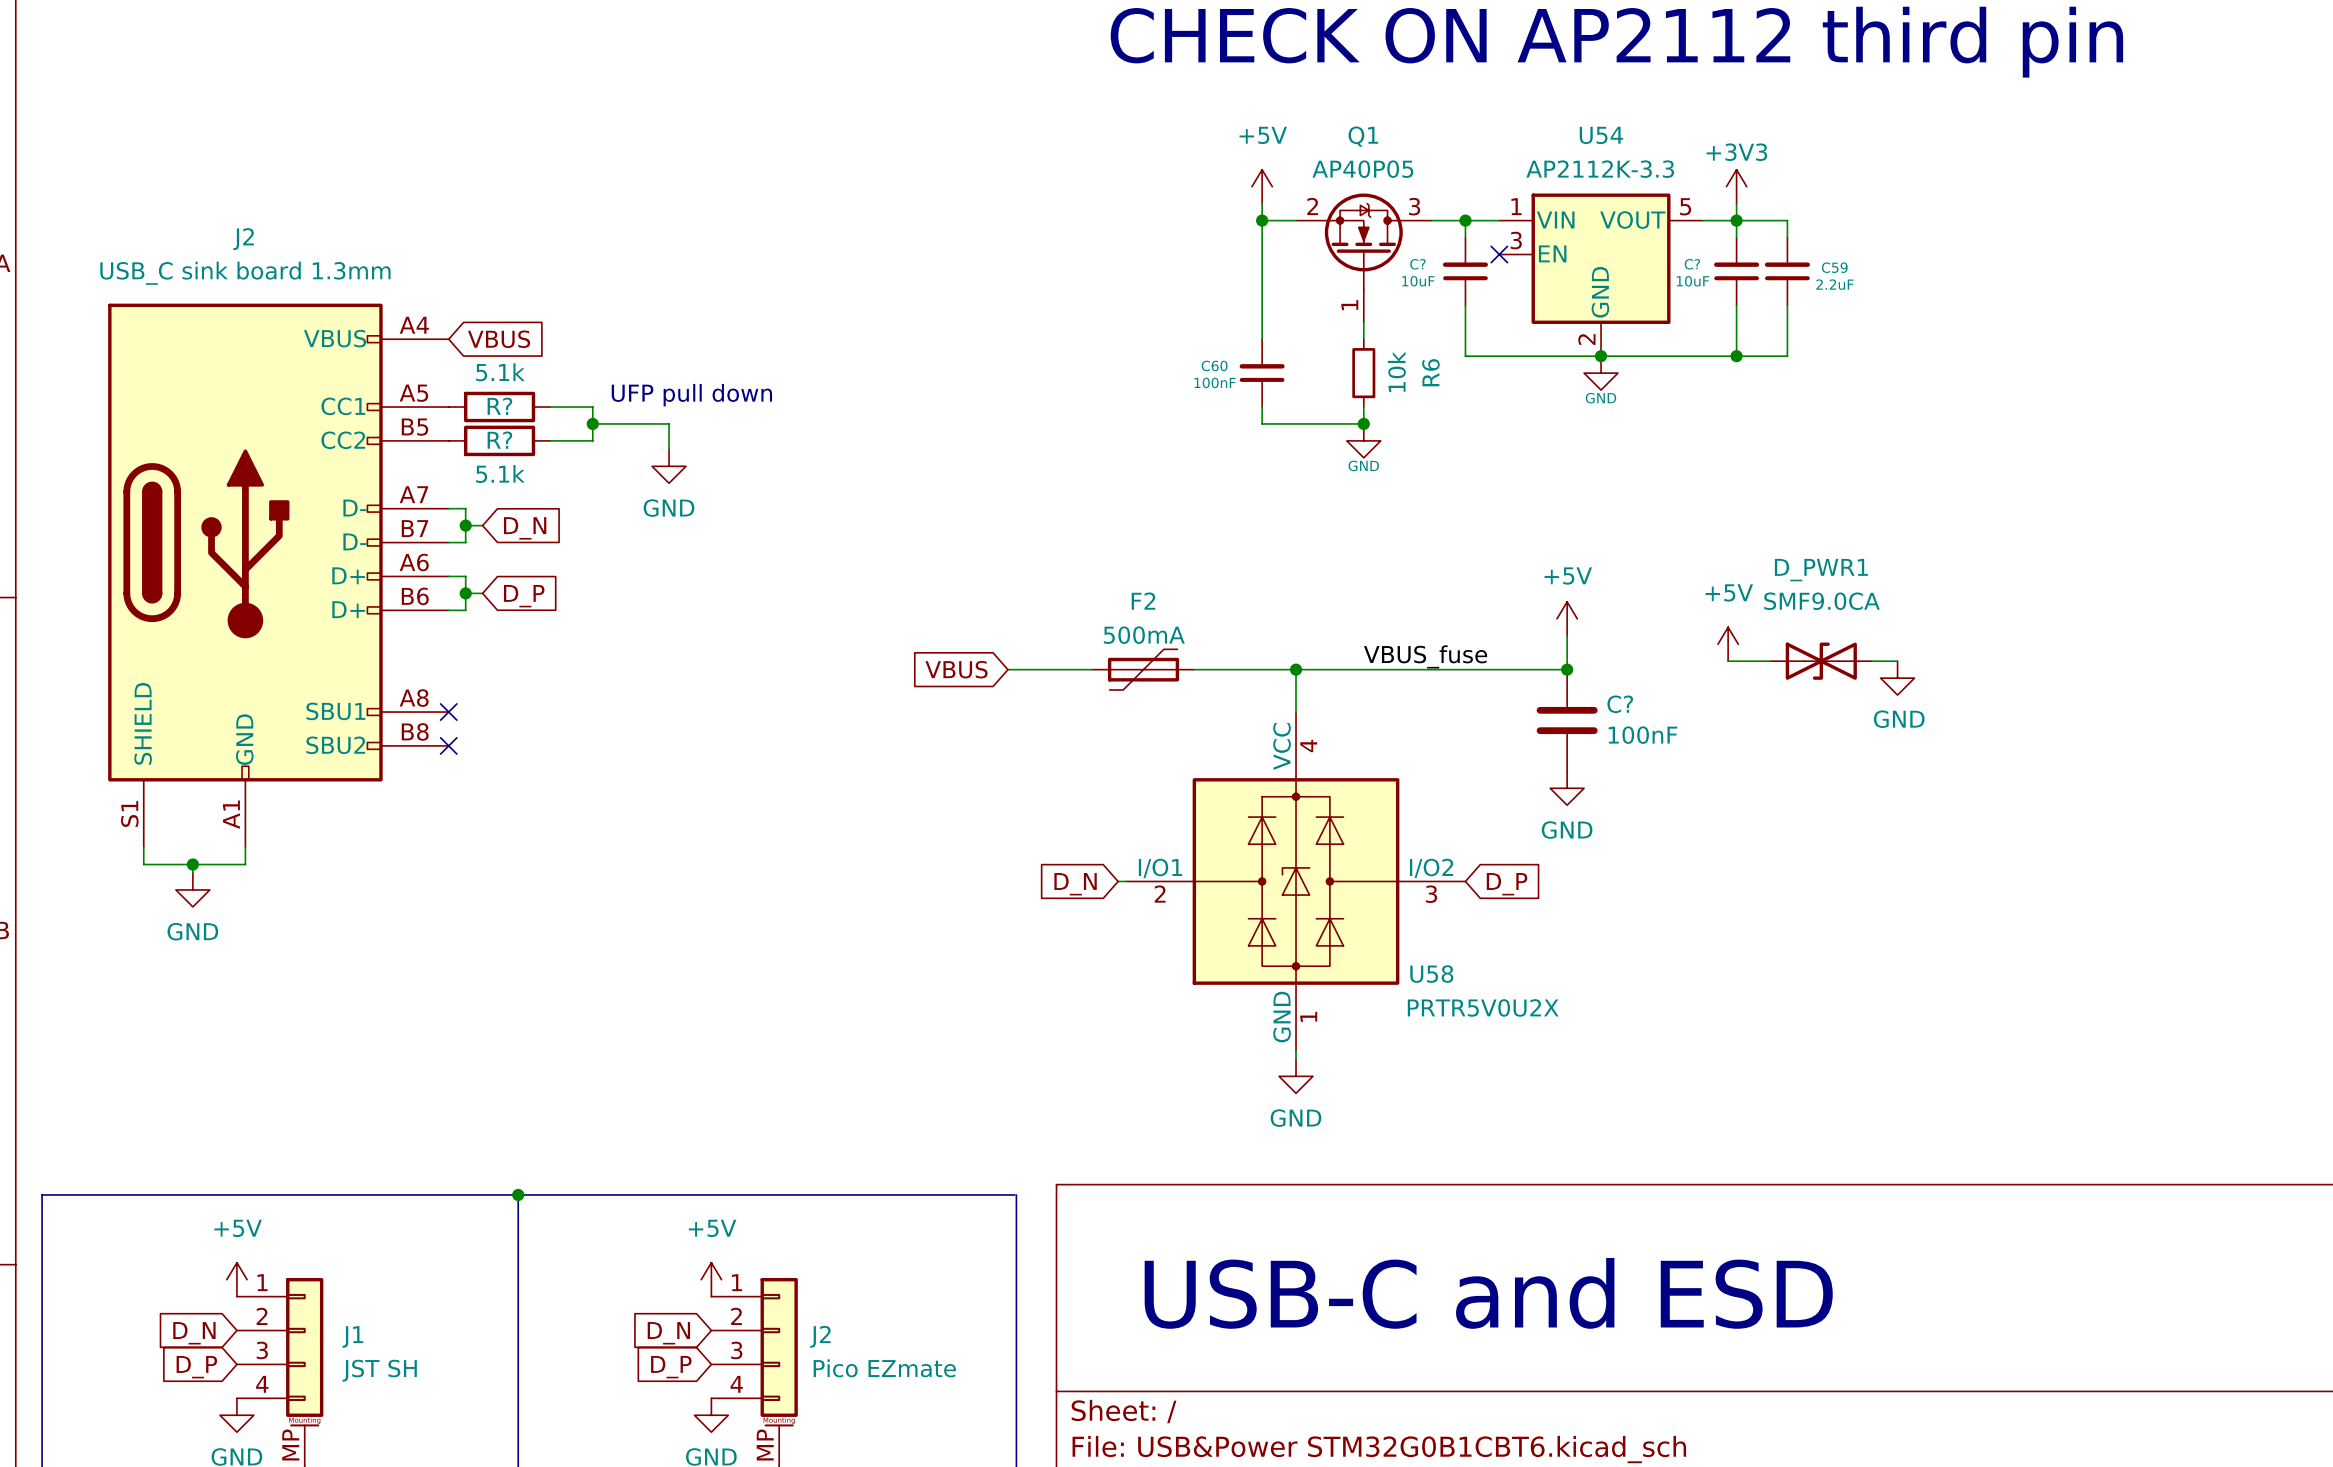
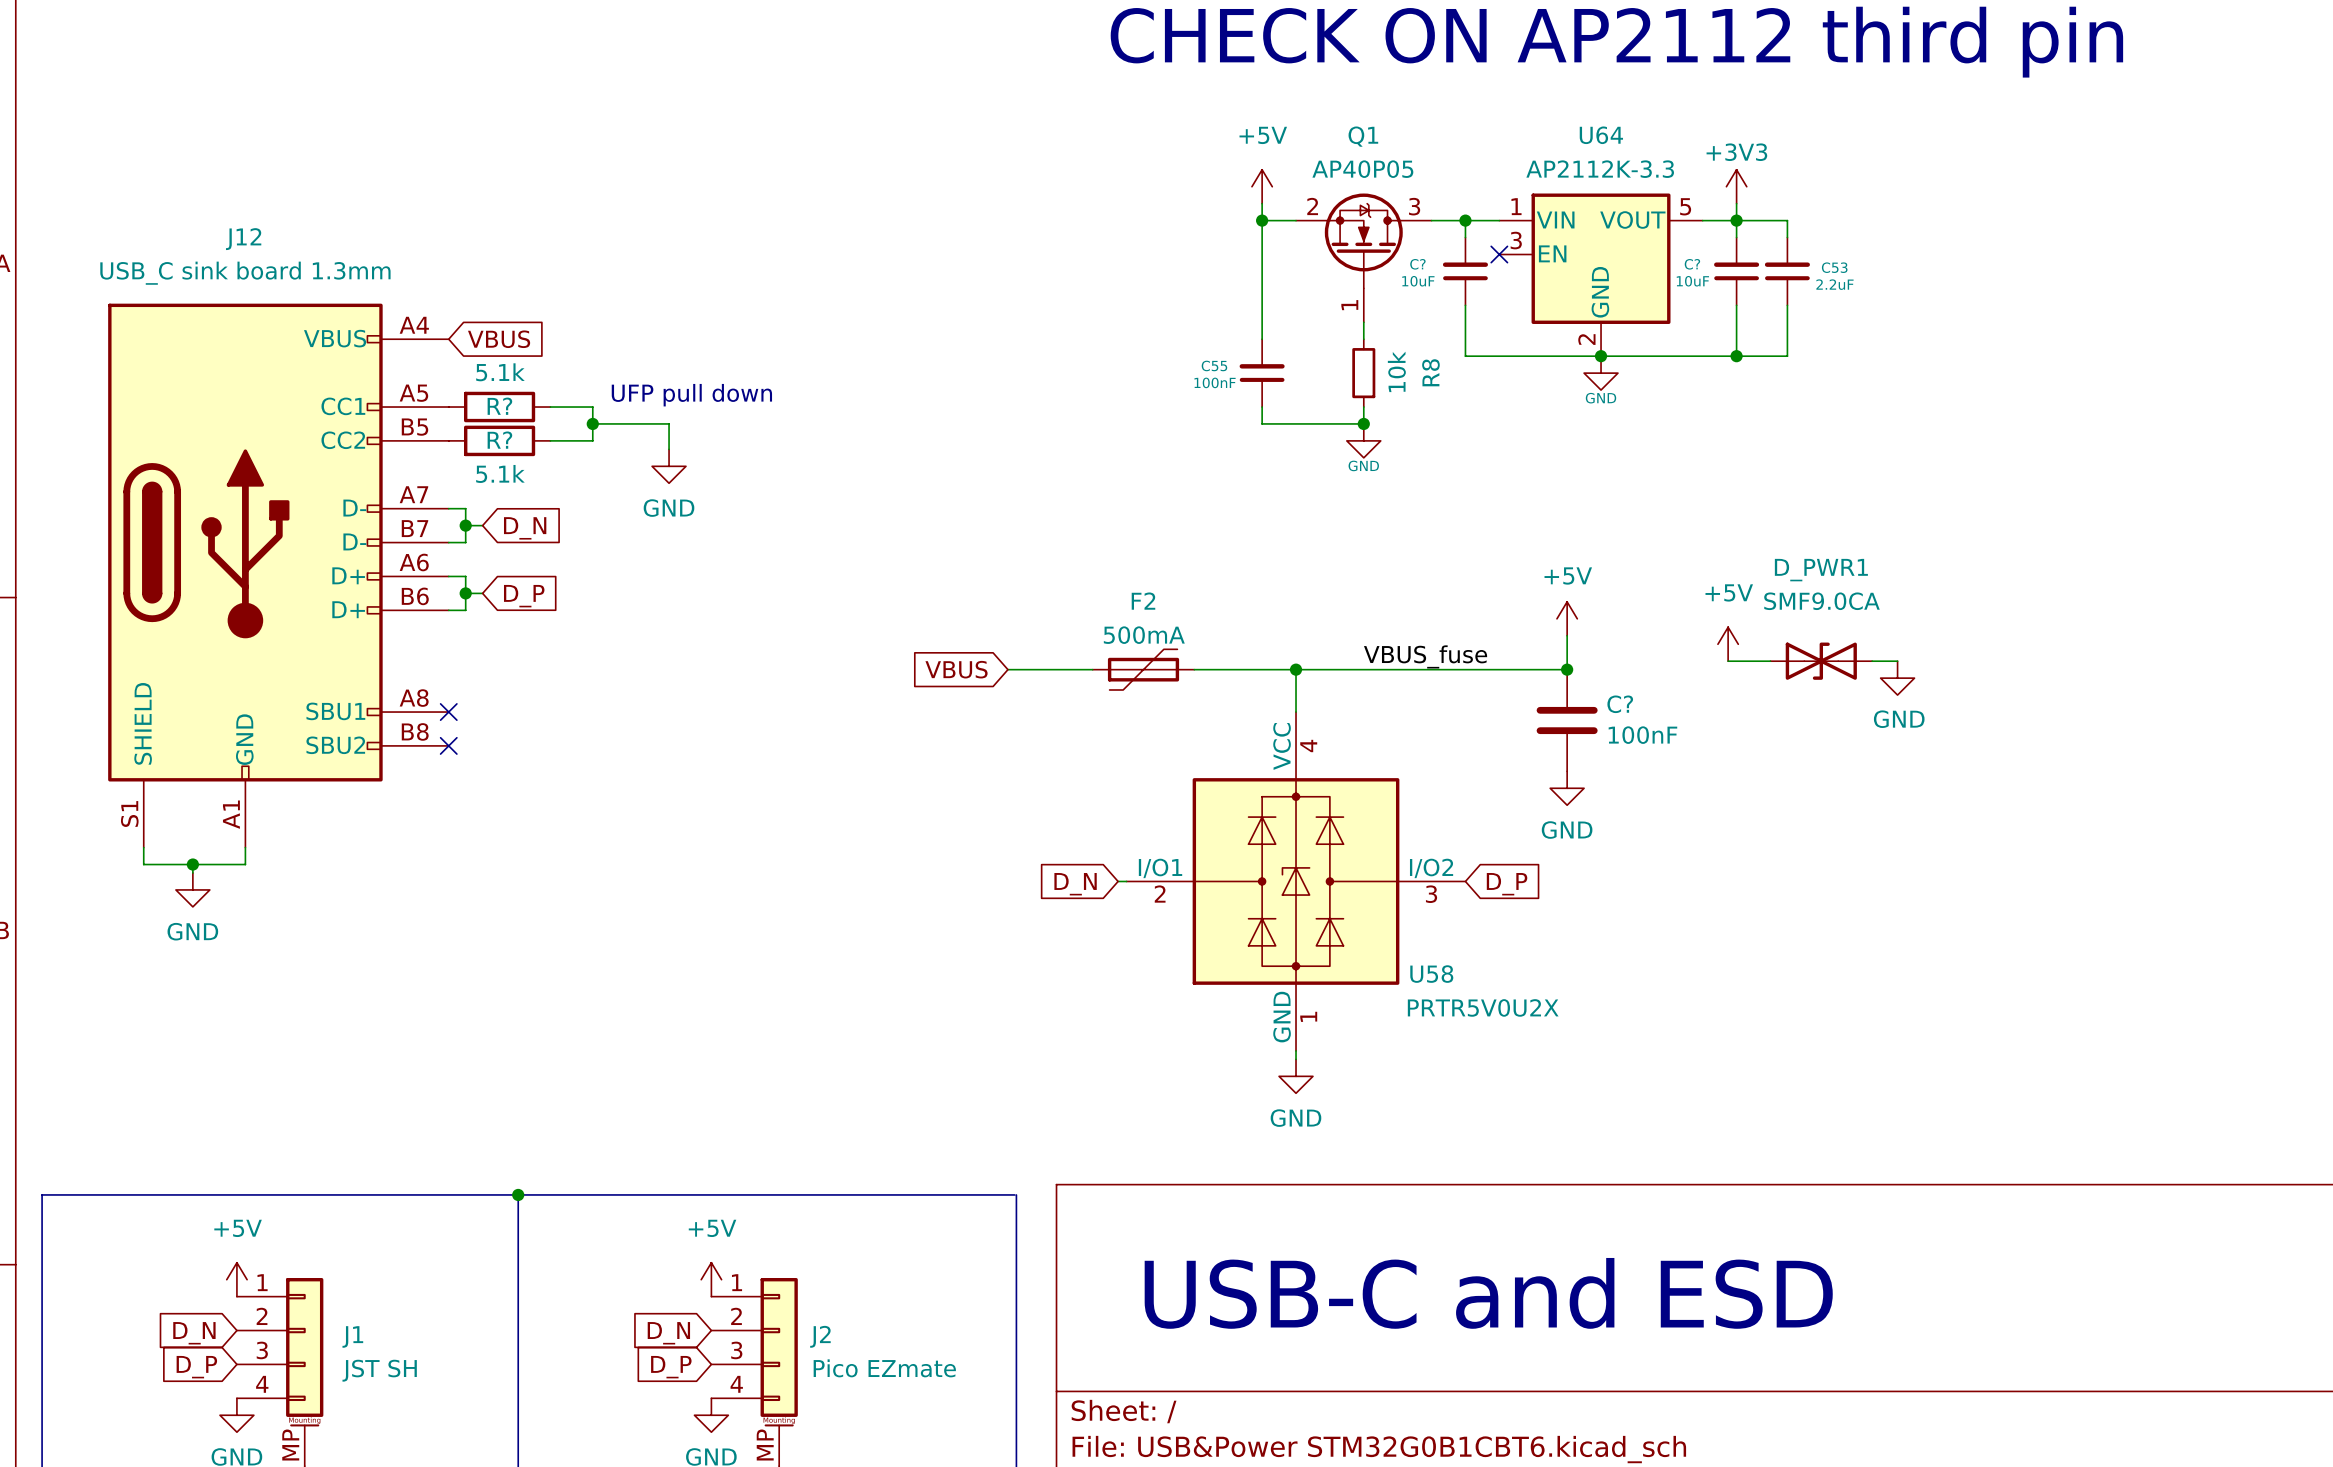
U54 name: U54 (1601, 135) -> U64 (1601, 135)
J2 name: J2 (243, 239) -> J12 (243, 239)
C59 name: C59 (1834, 267) -> C53 (1834, 267)
C60 name: C60 (1214, 365) -> C55 (1214, 365)
R6 name: R6 (1430, 372) -> R8 (1430, 372)

